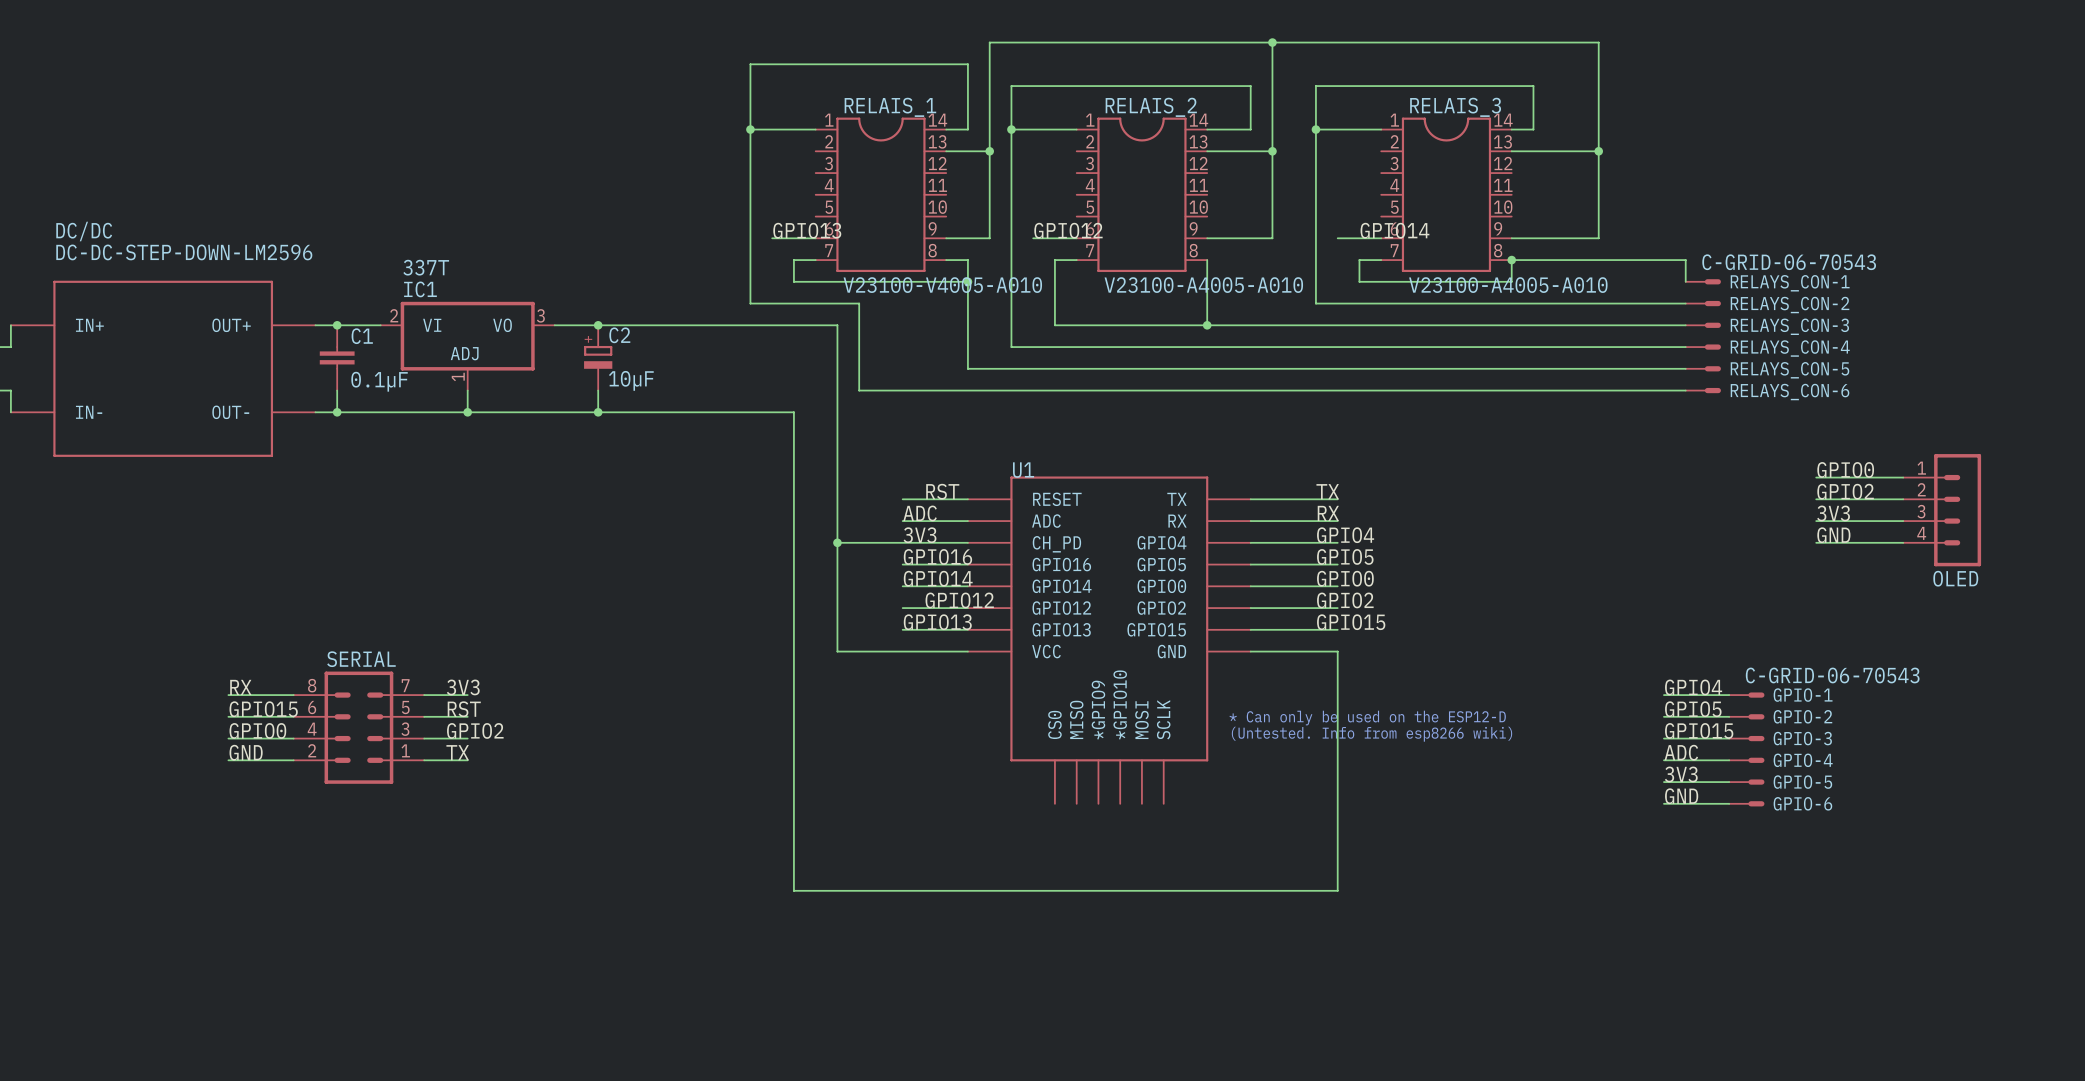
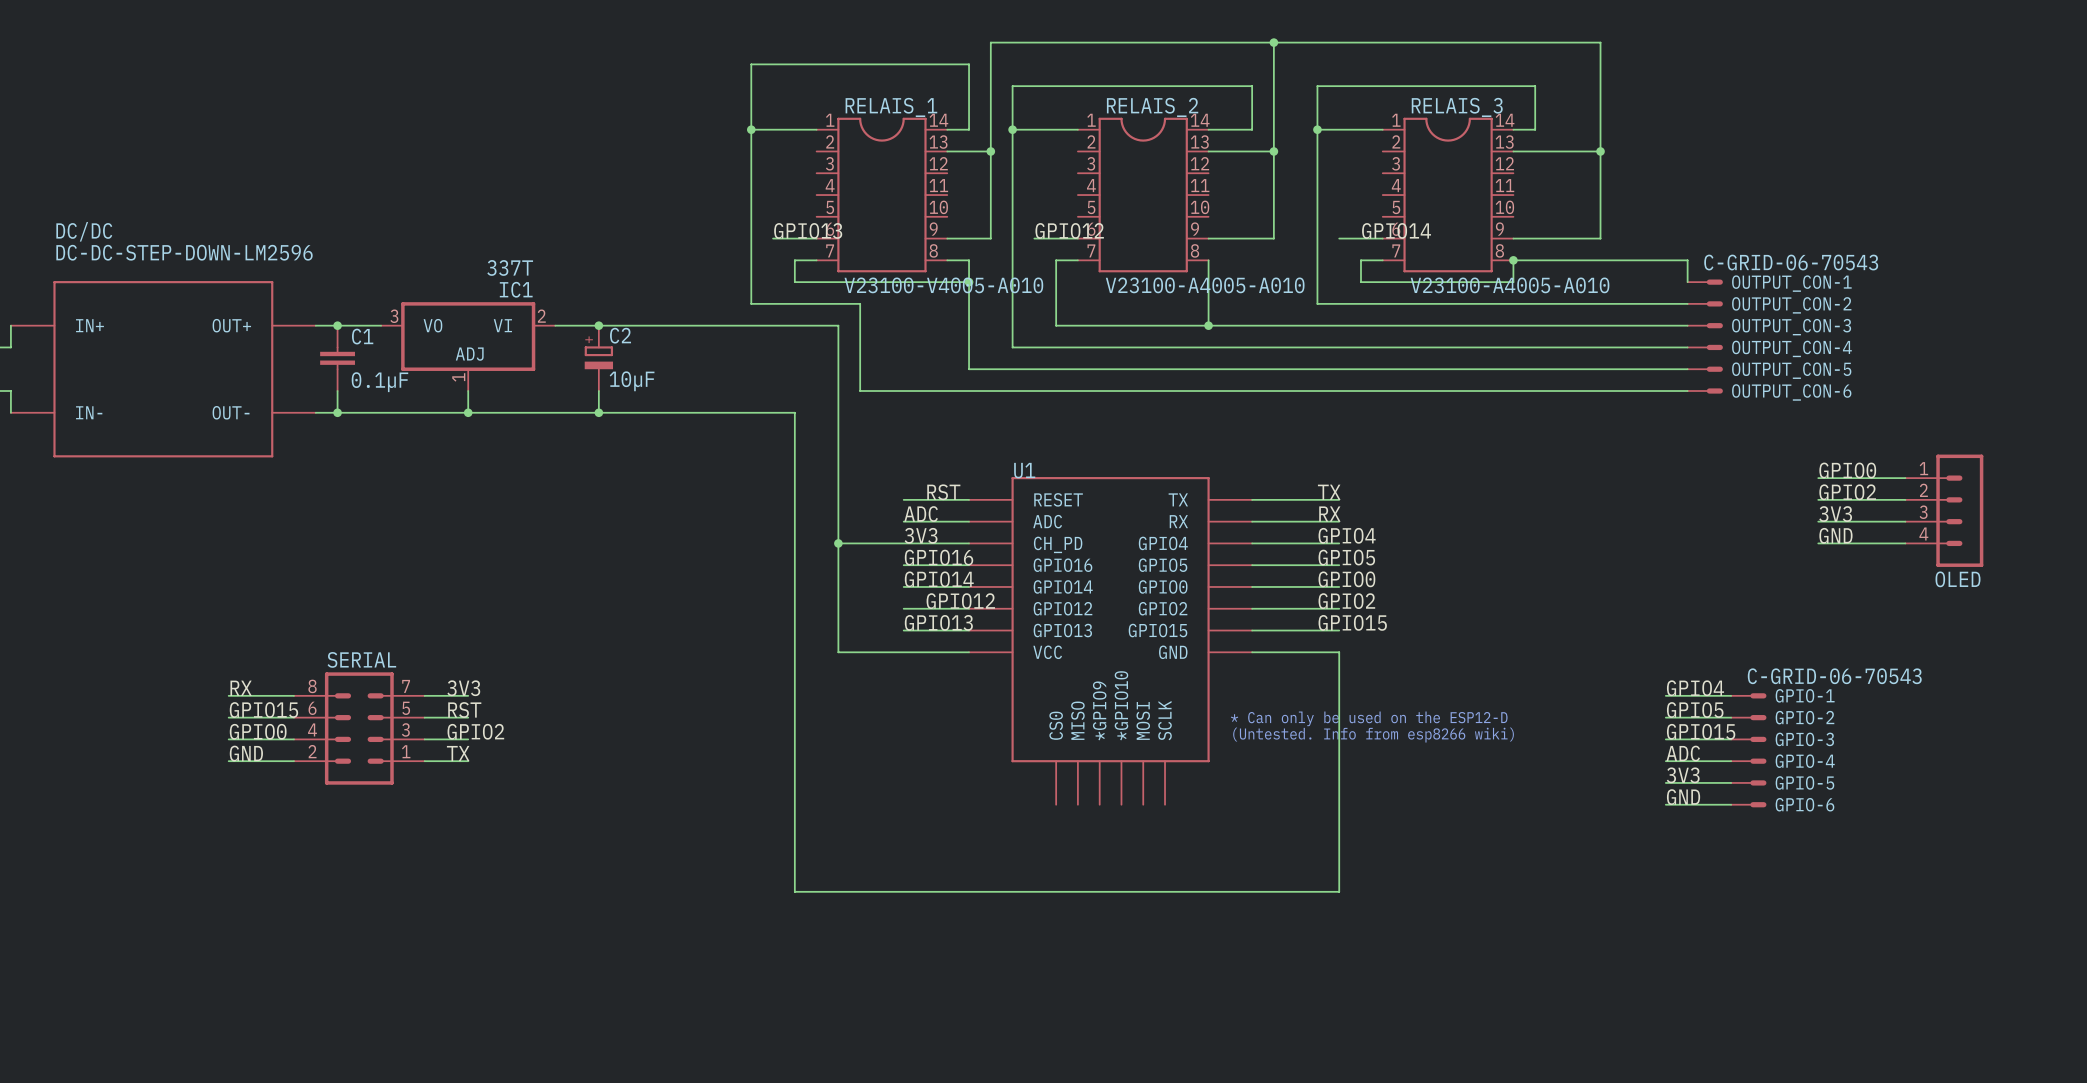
RELAYS_CON-1 name: RELAYS_CON-1 (1790, 283) -> OUTPUT_CON-1 (1791, 283)
RELAYS_CON-2 name: RELAYS_CON-2 (1790, 305) -> OUTPUT_CON-2 (1791, 305)
RELAYS_CON-3 name: RELAYS_CON-3 (1789, 326) -> OUTPUT_CON-3 (1791, 327)
IC1 flip: as is (467, 336) -> left-right (468, 336)
RELAYS_CON-4 name: RELAYS_CON-4 (1790, 348) -> OUTPUT_CON-4 (1791, 348)
RELAYS_CON-5 name: RELAYS_CON-5 (1789, 370) -> OUTPUT_CON-5 (1791, 370)
RELAYS_CON-6 name: RELAYS_CON-6 (1790, 392) -> OUTPUT_CON-6 (1791, 392)

